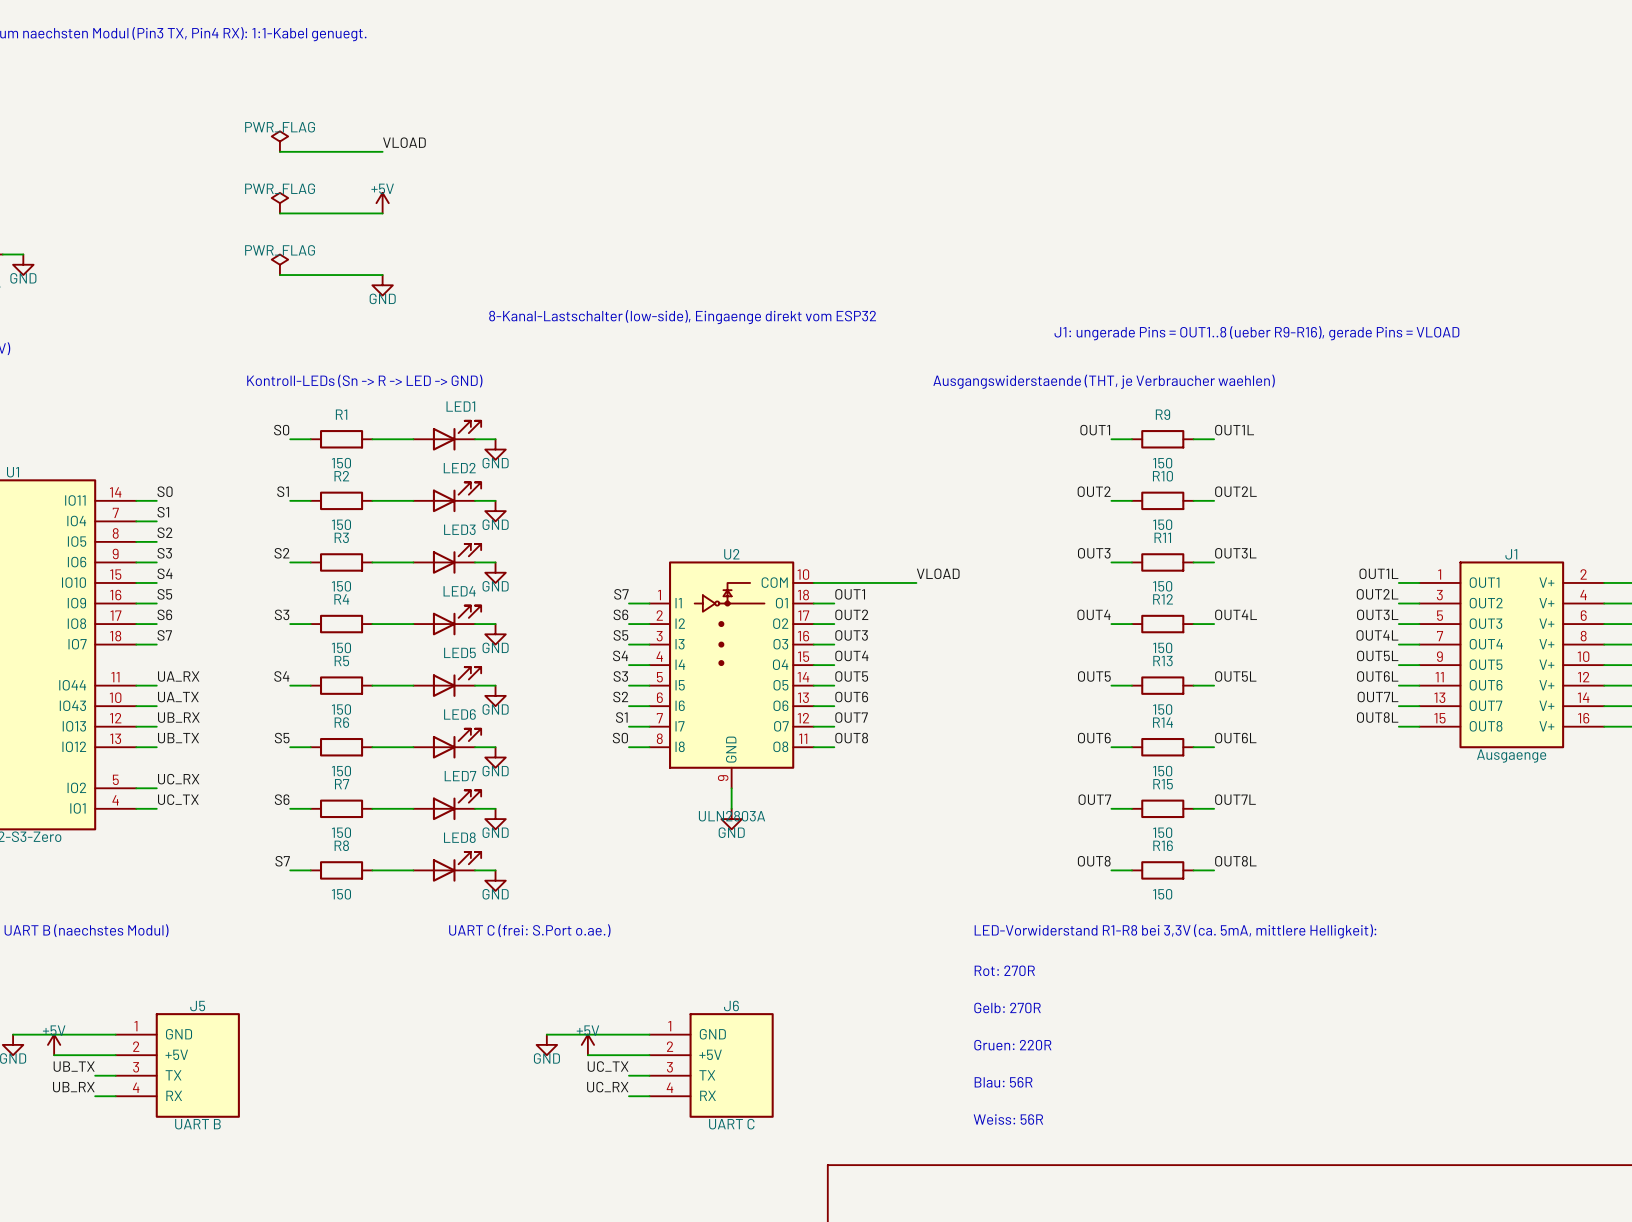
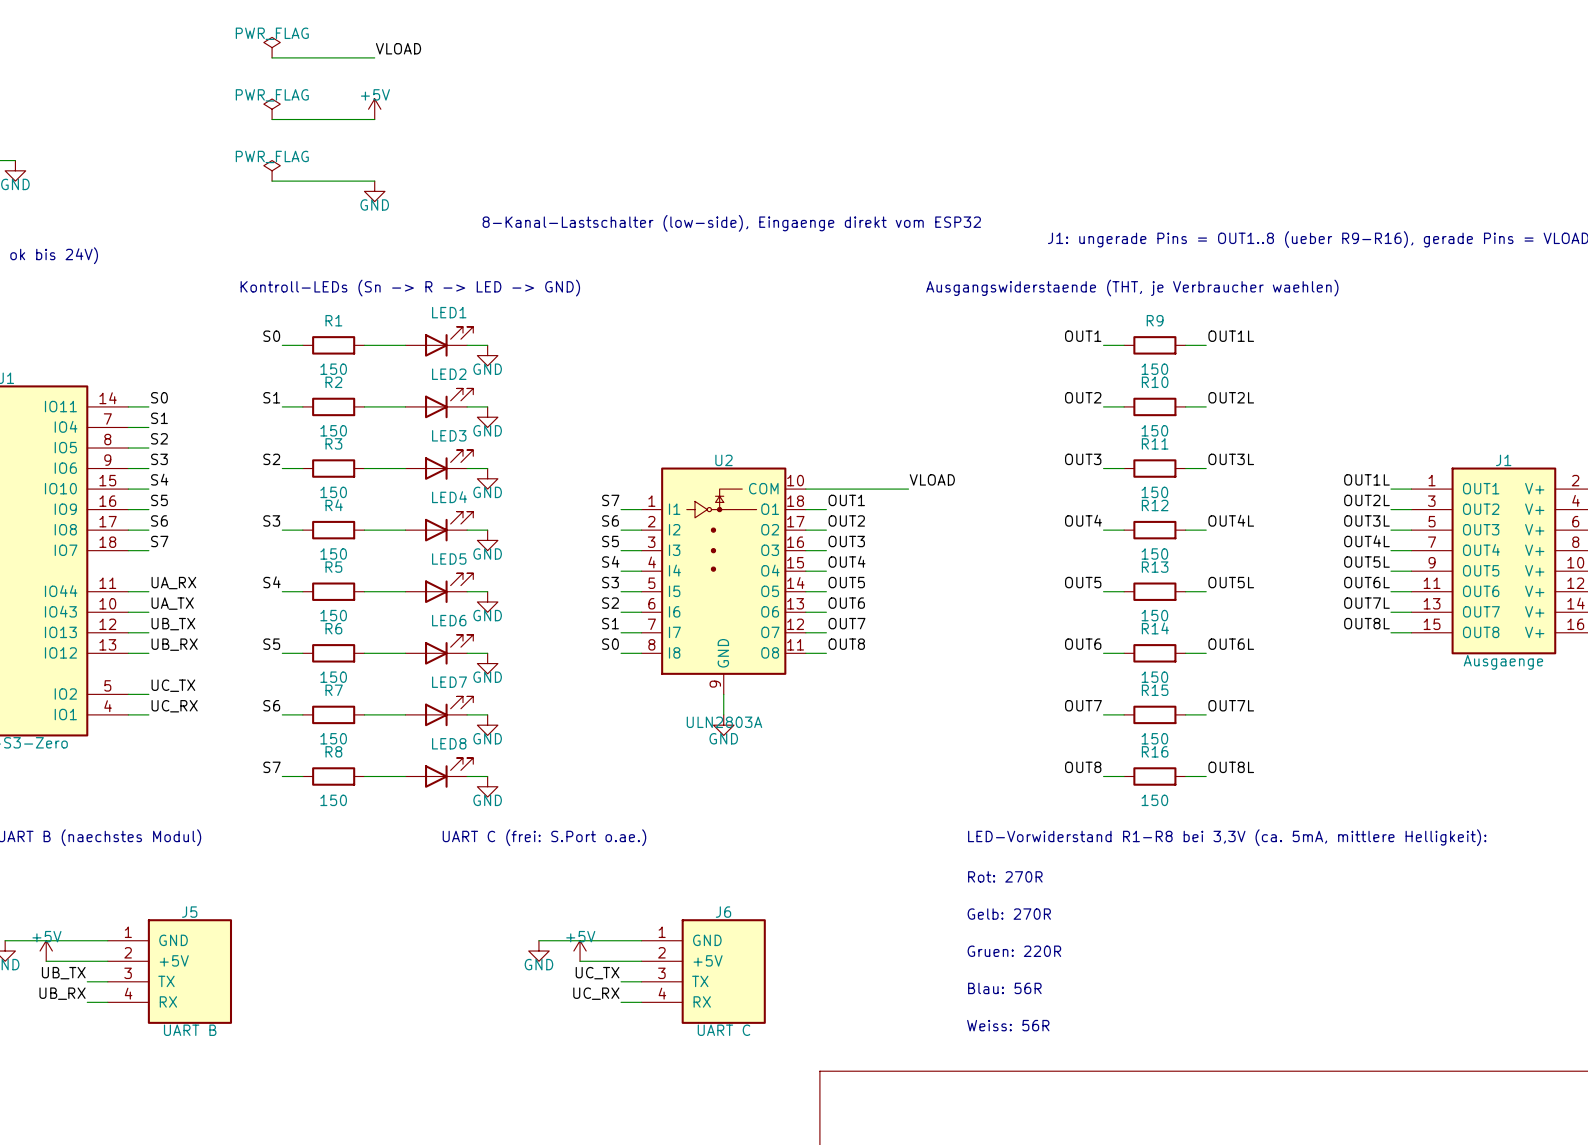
label: UB_RX (178, 717) -> UB_TX (173, 624)
label: UB_TX (178, 738) -> UB_RX (174, 644)
label: UC_RX (178, 779) -> UC_TX (173, 685)
label: UC_TX (178, 799) -> UC_RX (174, 706)

